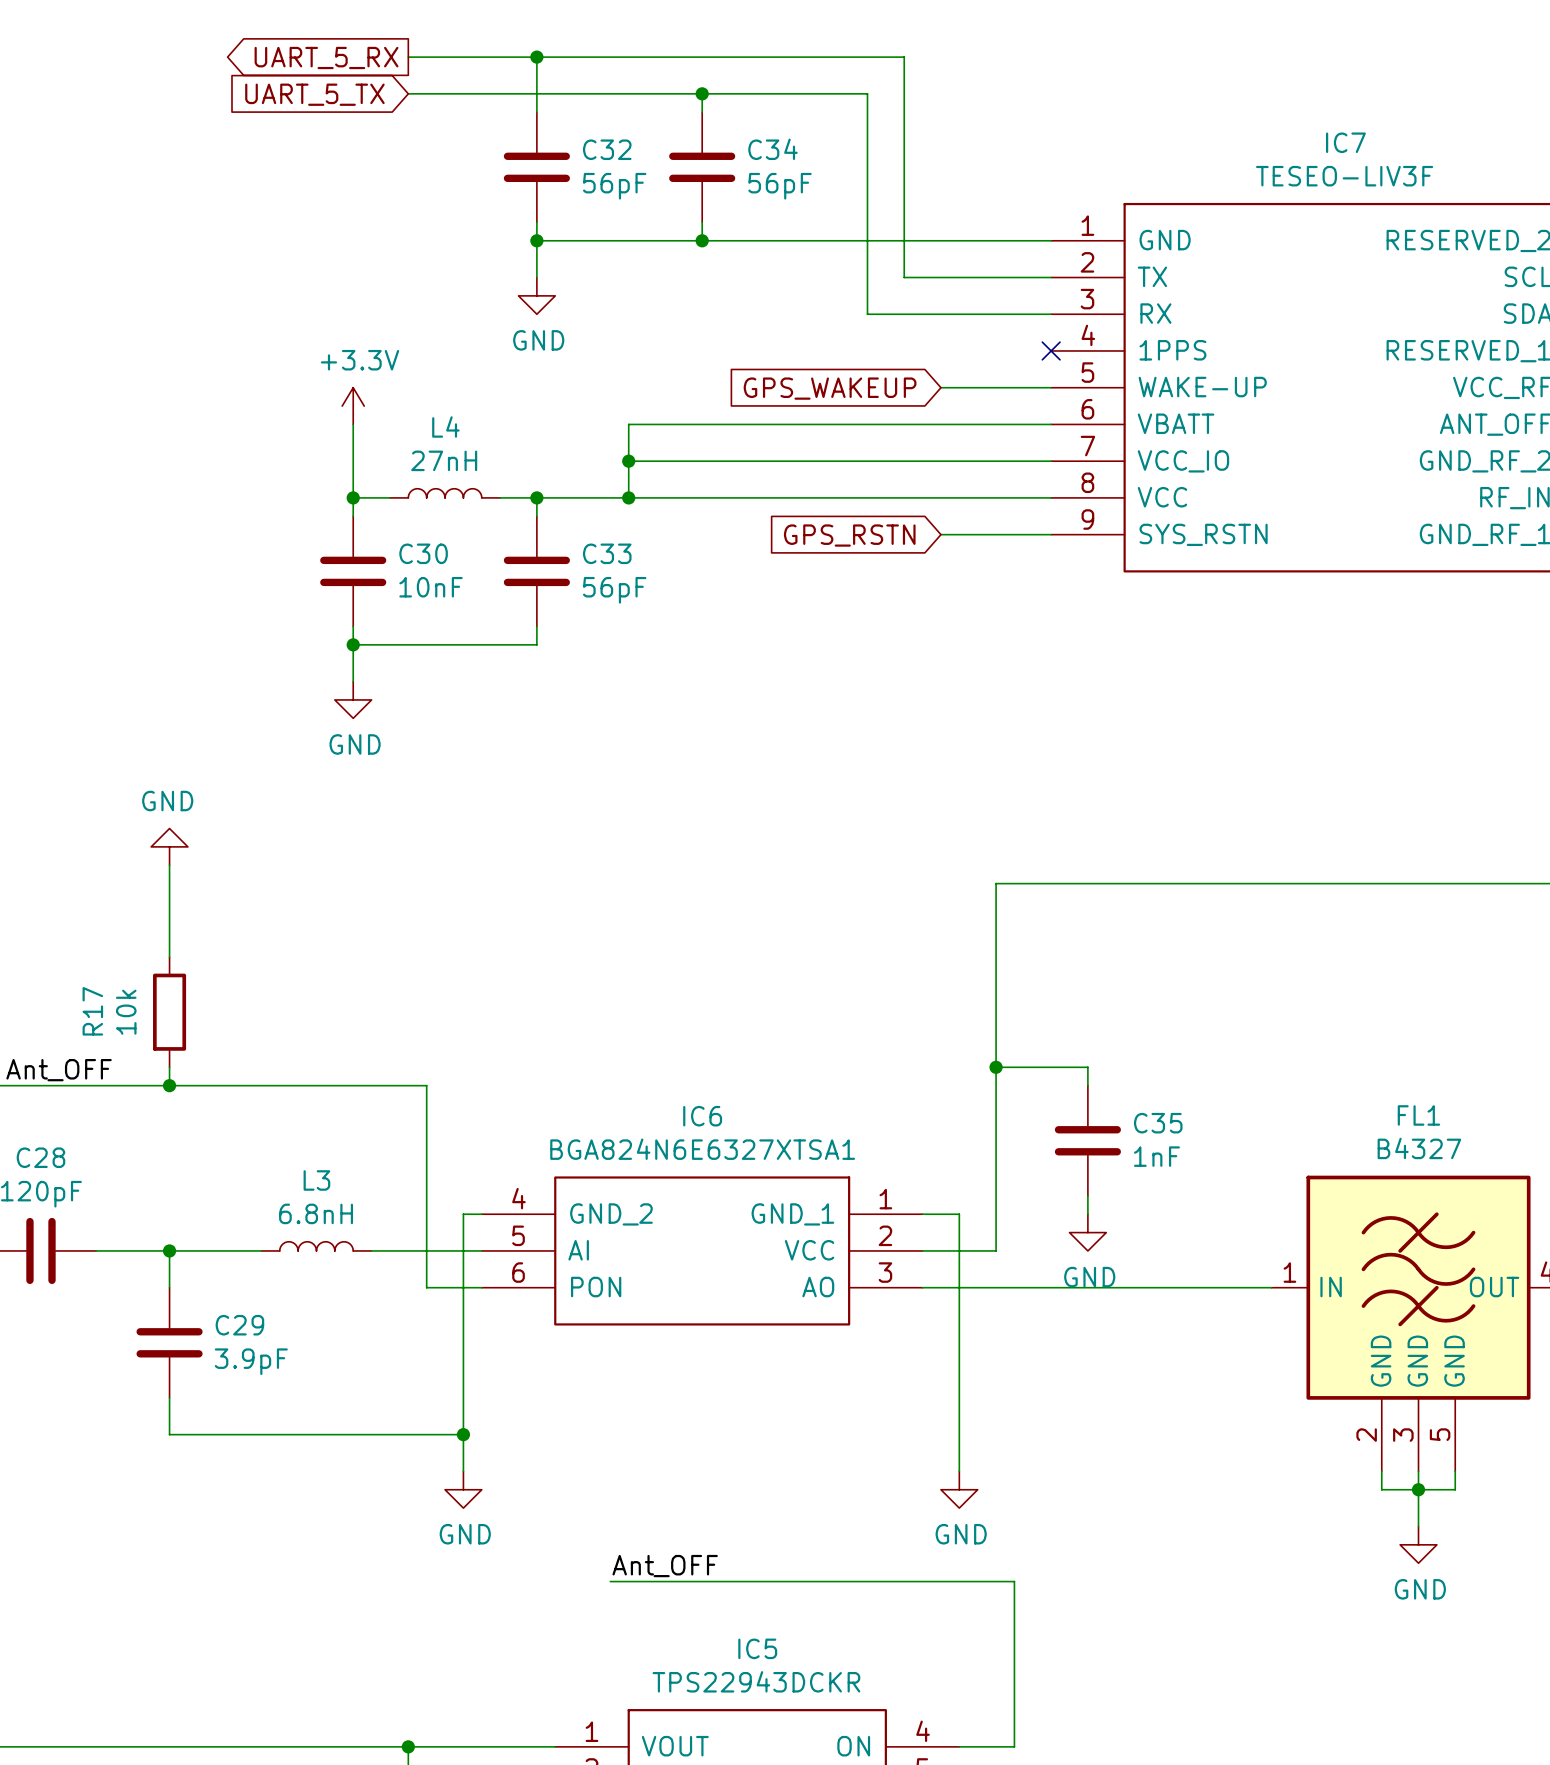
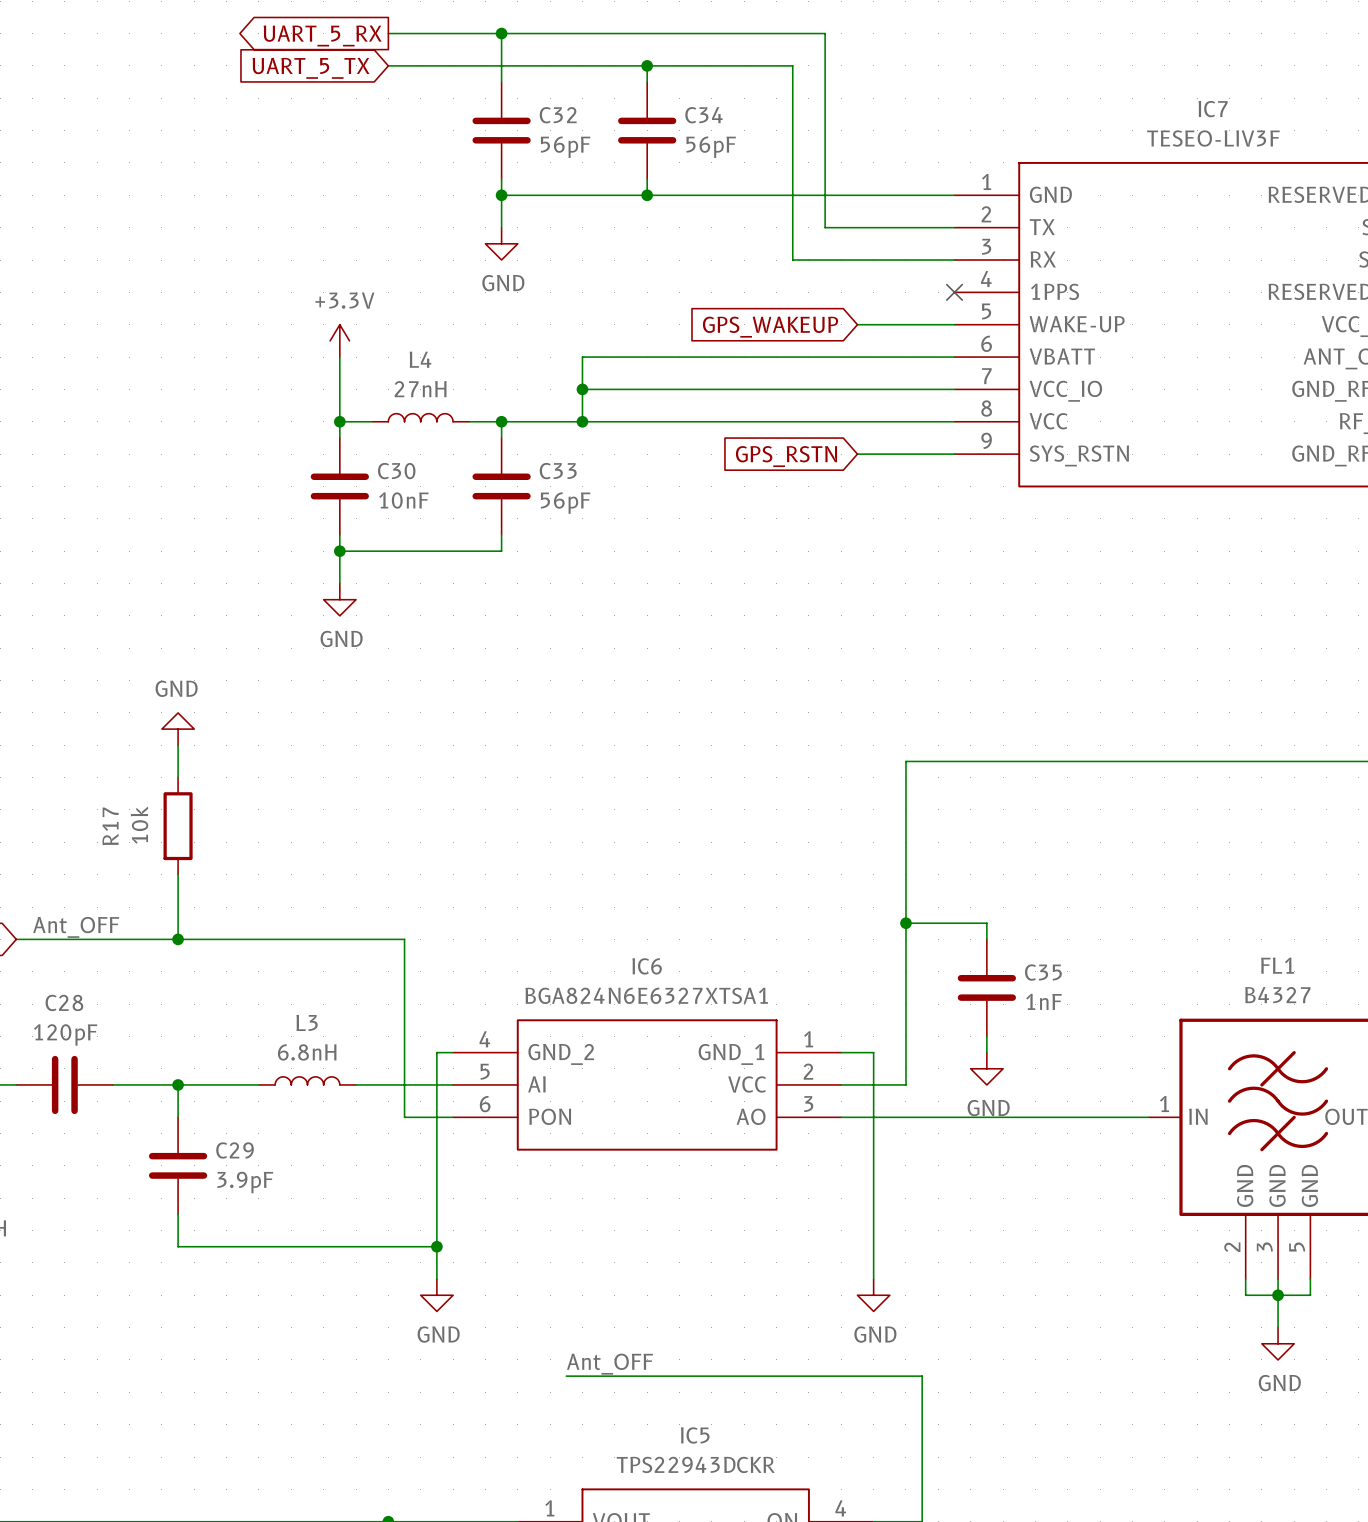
wire: (169, 901) (169, 957) -> (178, 874) (178, 923)
R17 position: (169, 1012) -> (178, 826)

